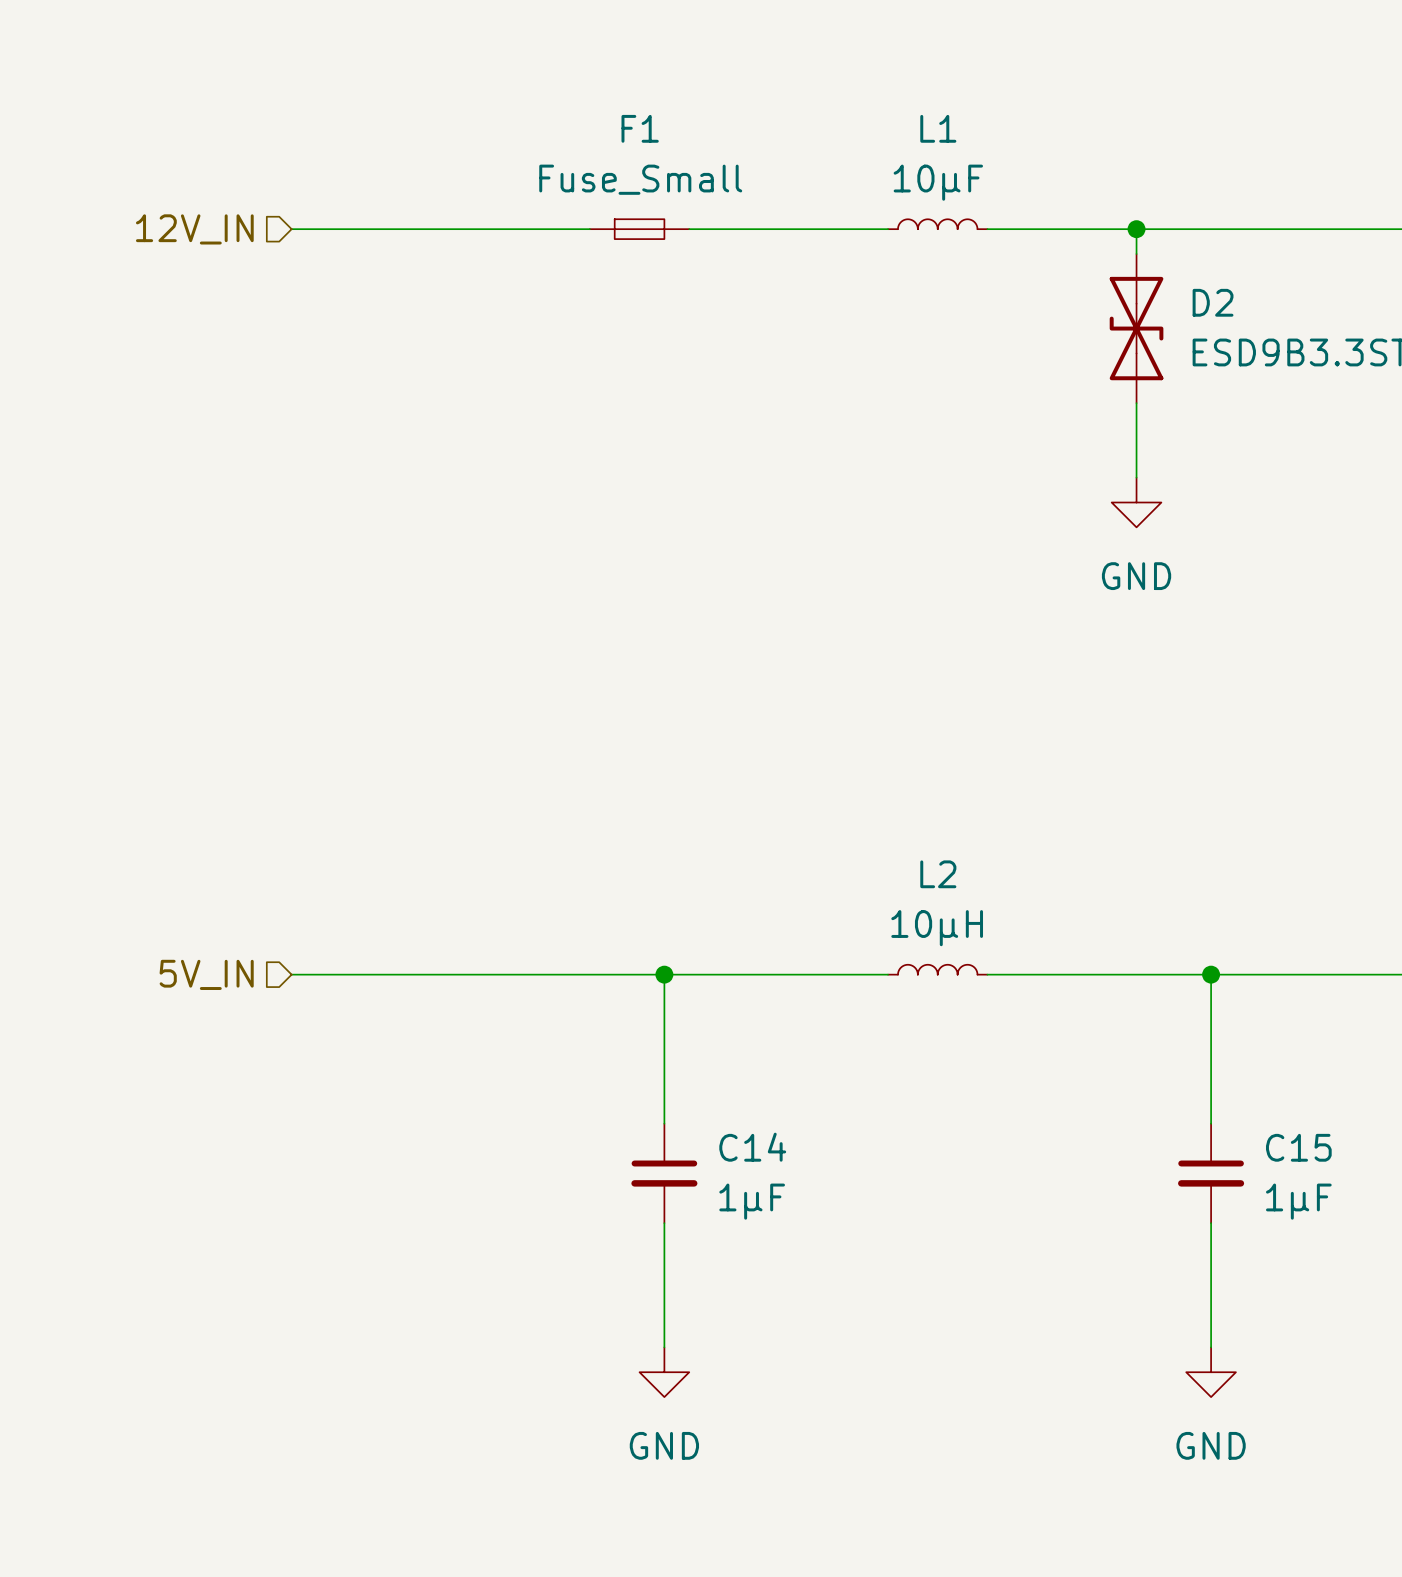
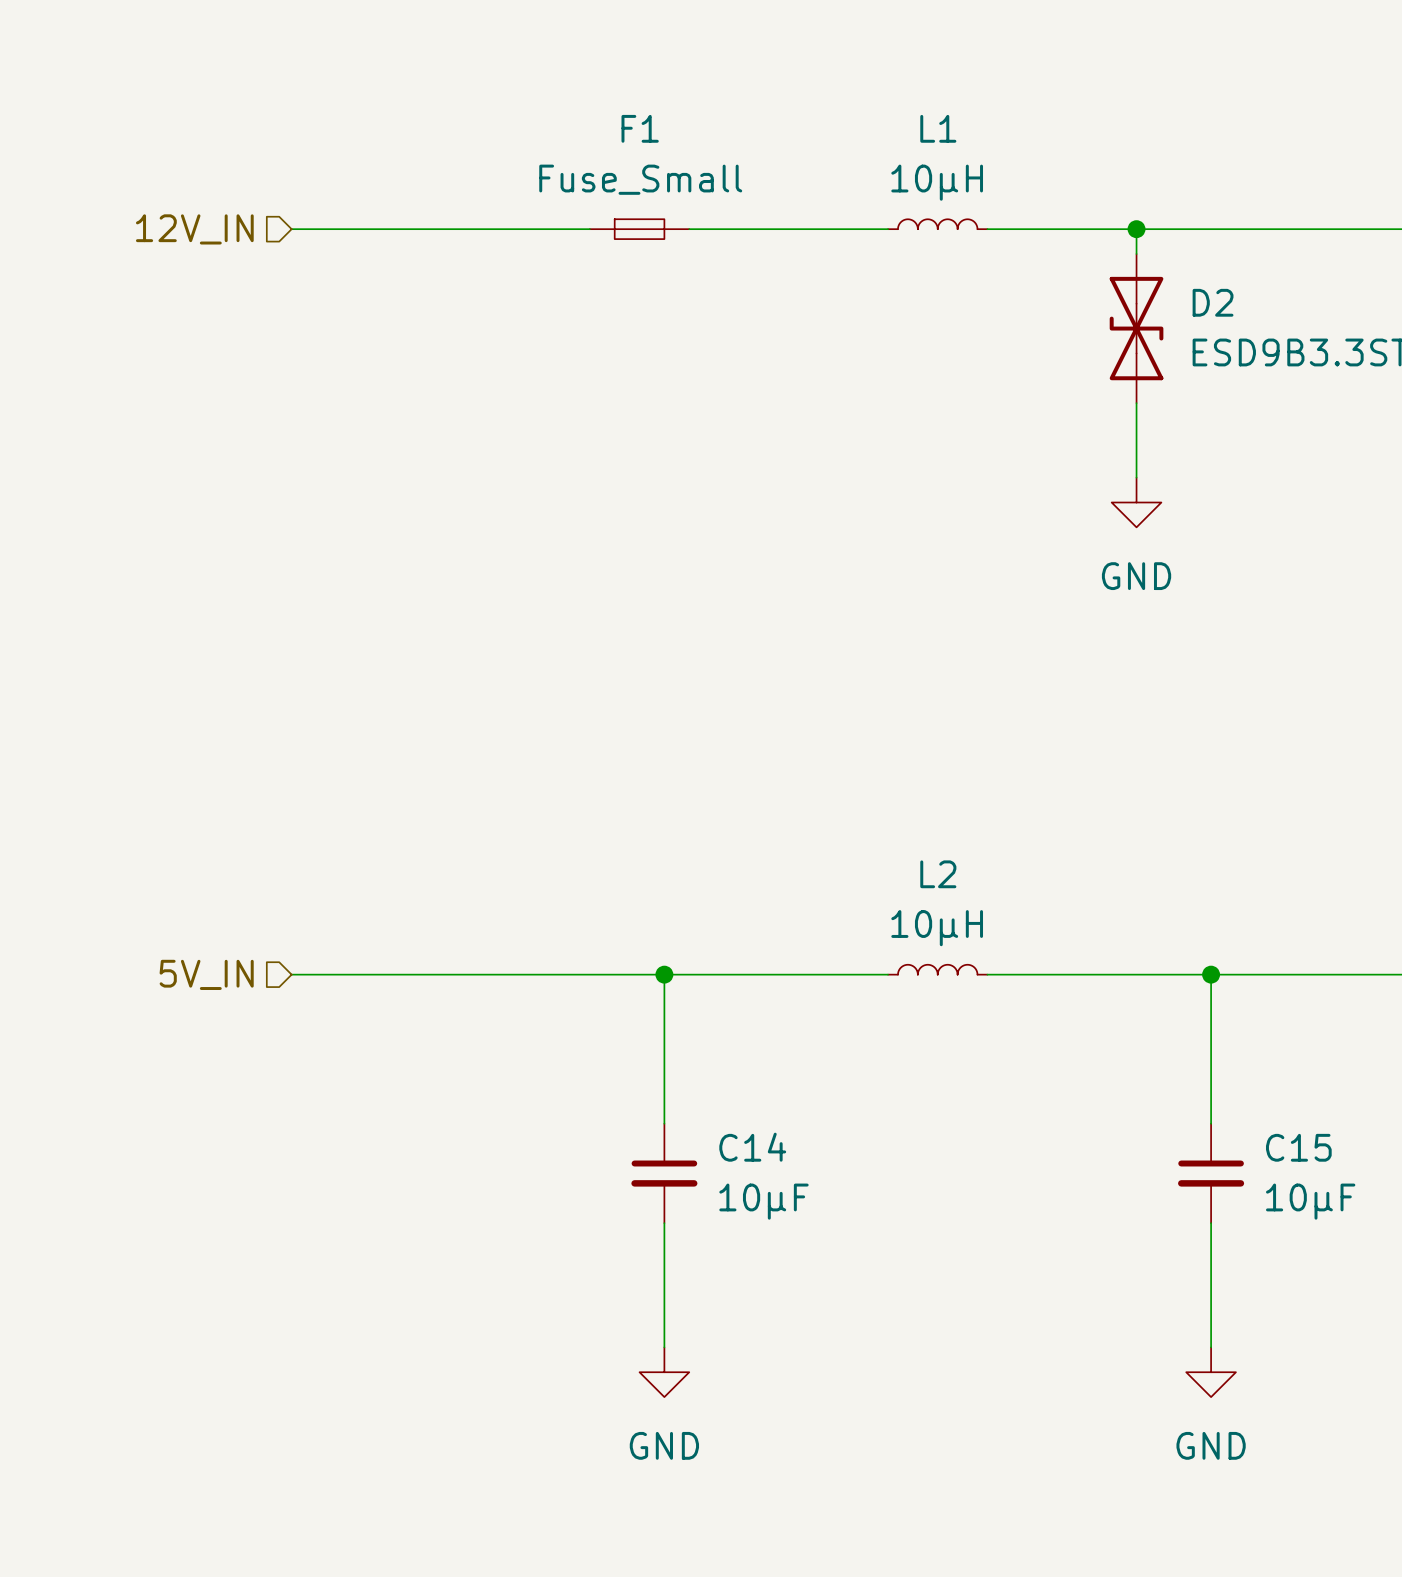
L1 value: 10µF (938, 182) -> 10µH (937, 182)
C14 value: 1µF (752, 1201) -> 10µF (763, 1201)
C15 value: 1µF (1298, 1201) -> 10µF (1310, 1201)

